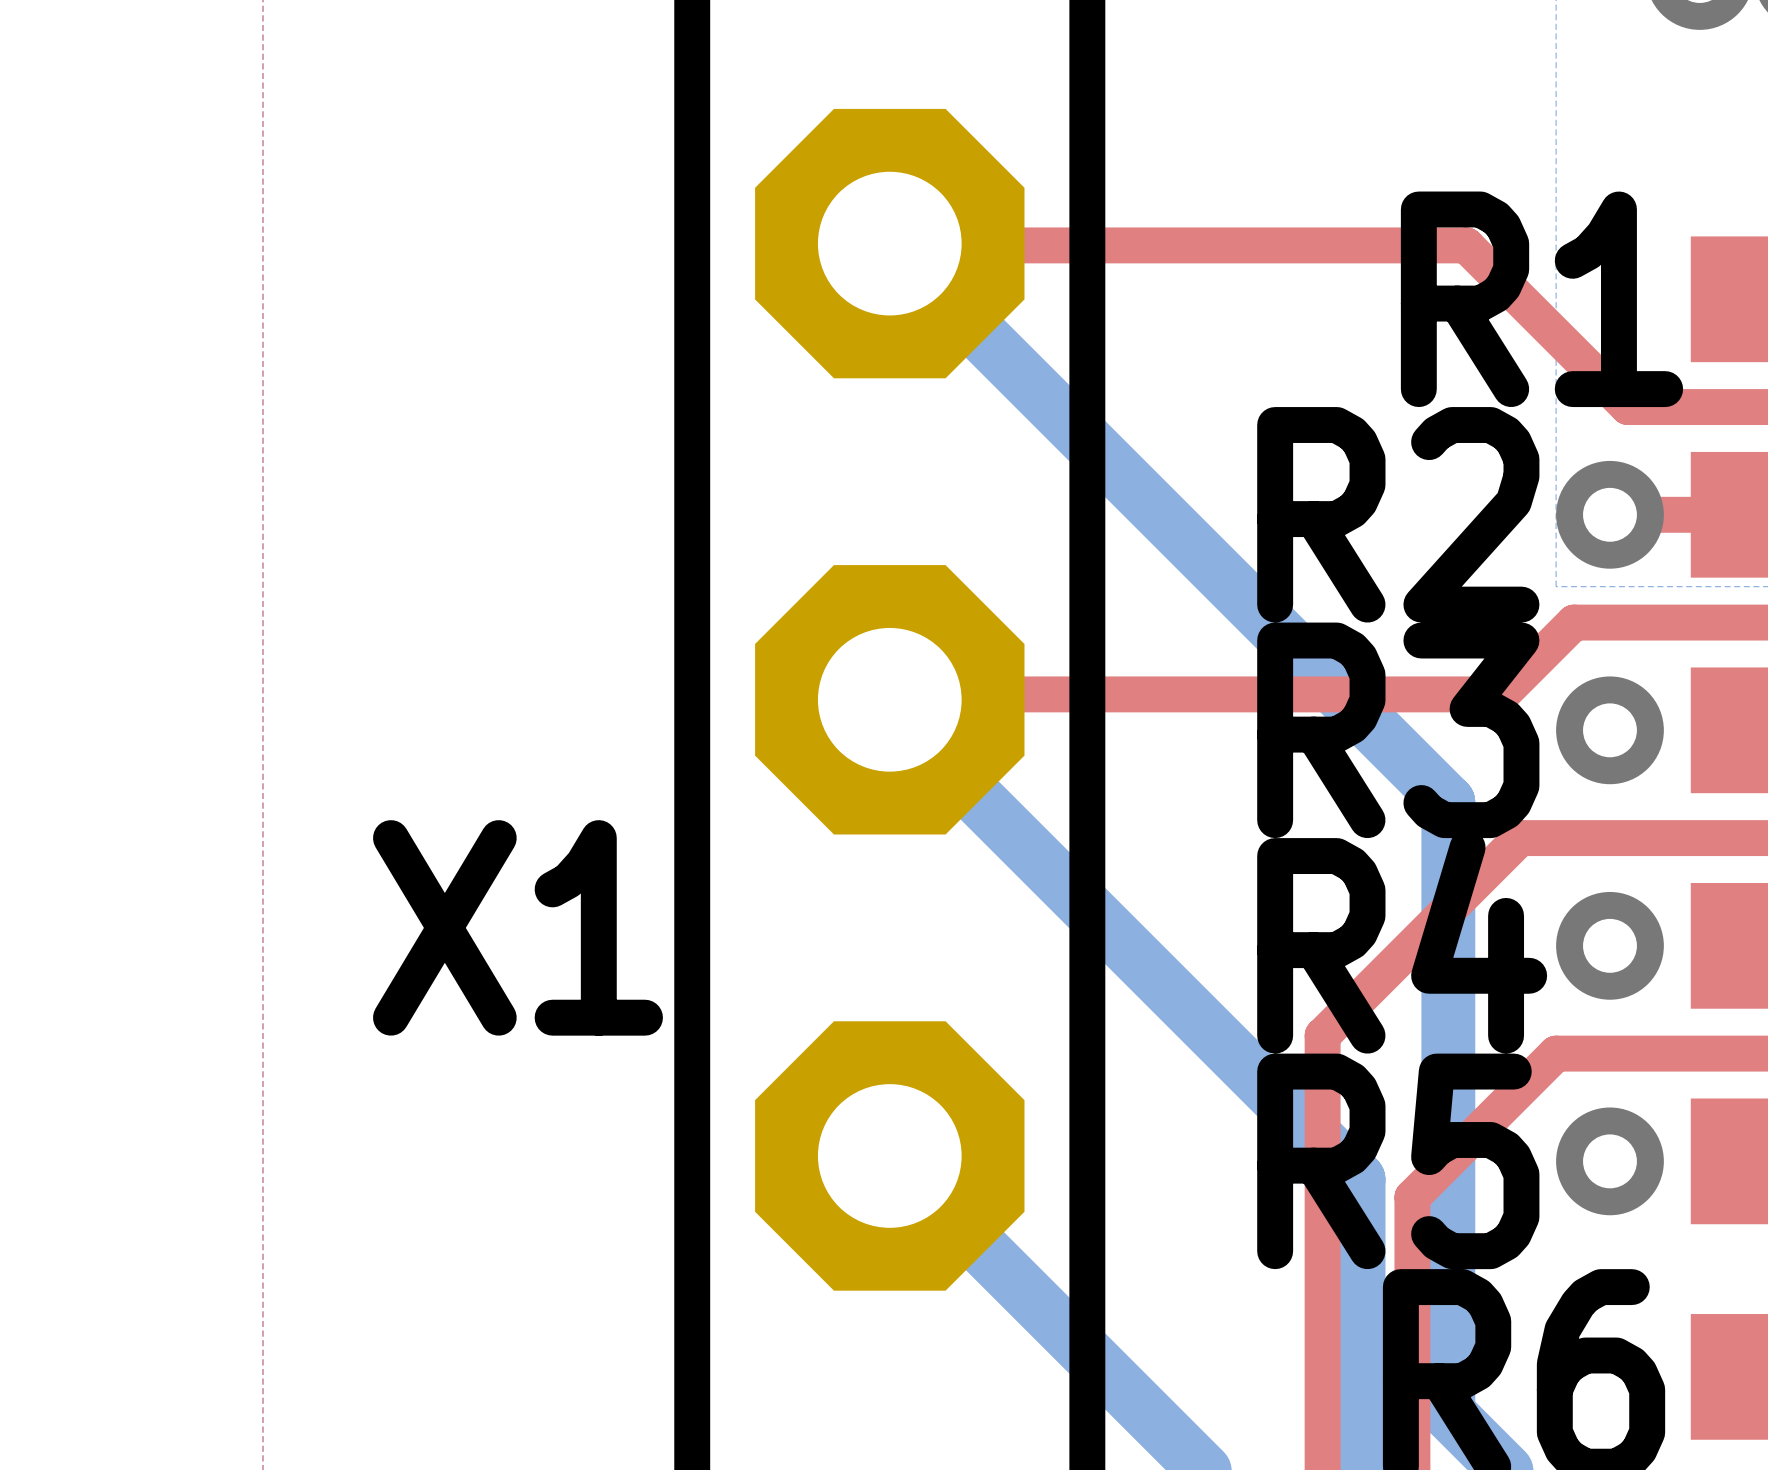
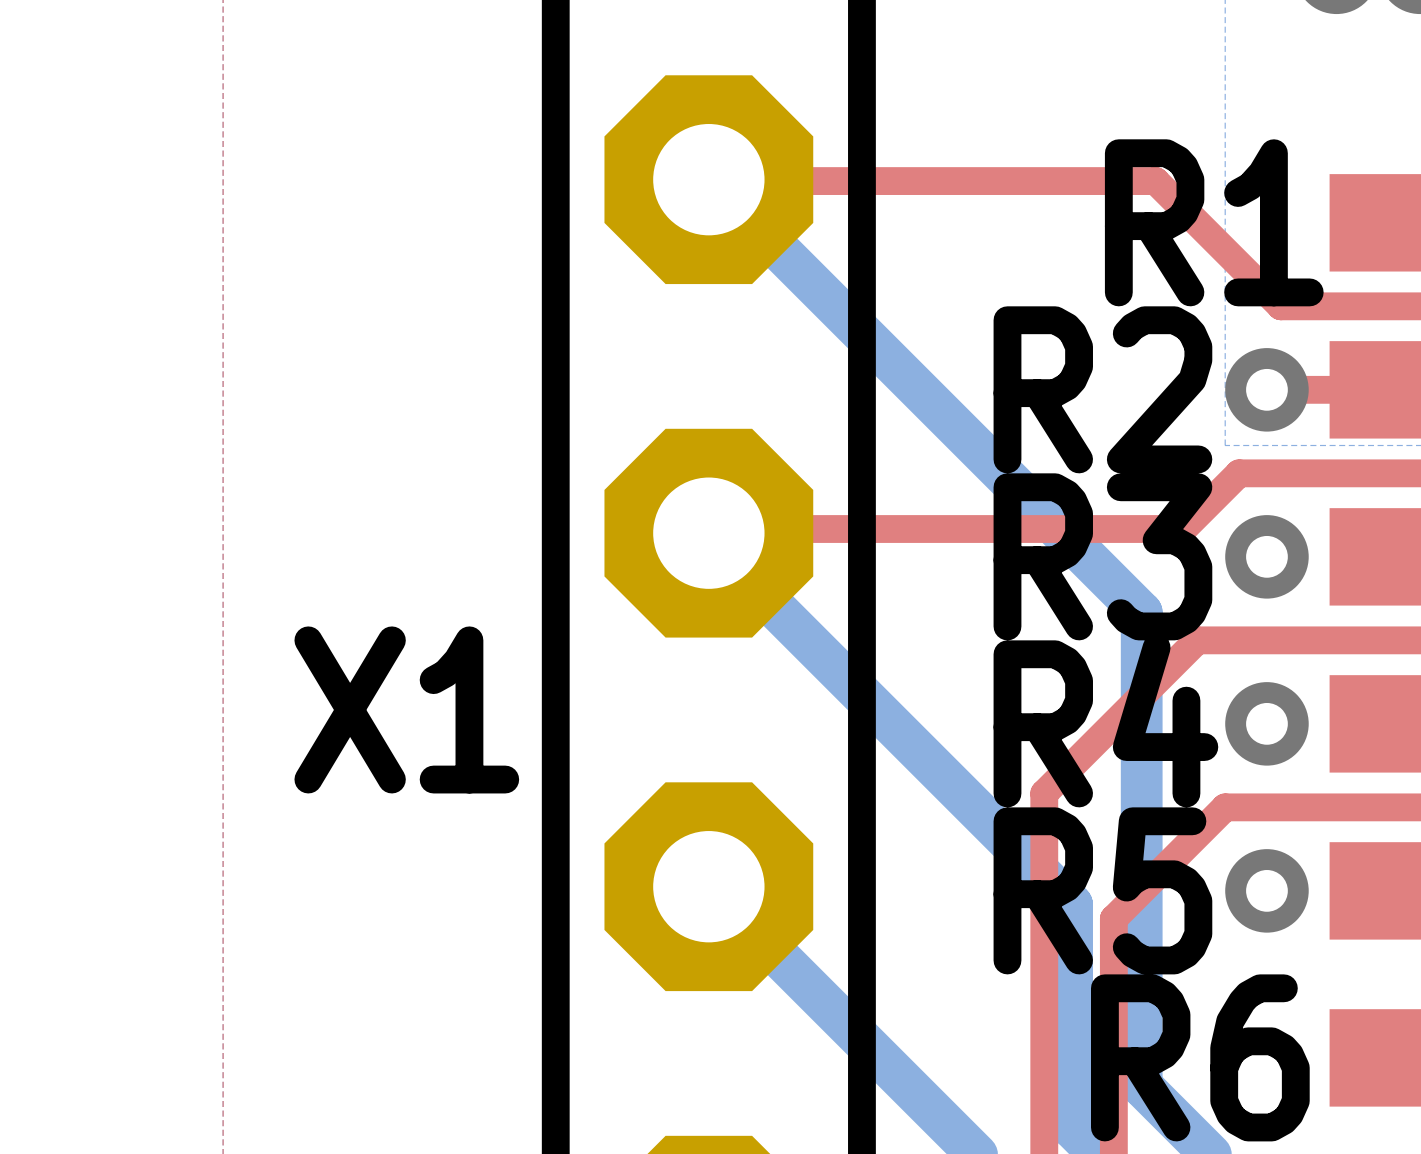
X1 name position: X1 (517, 927) -> X1 (406, 709)

